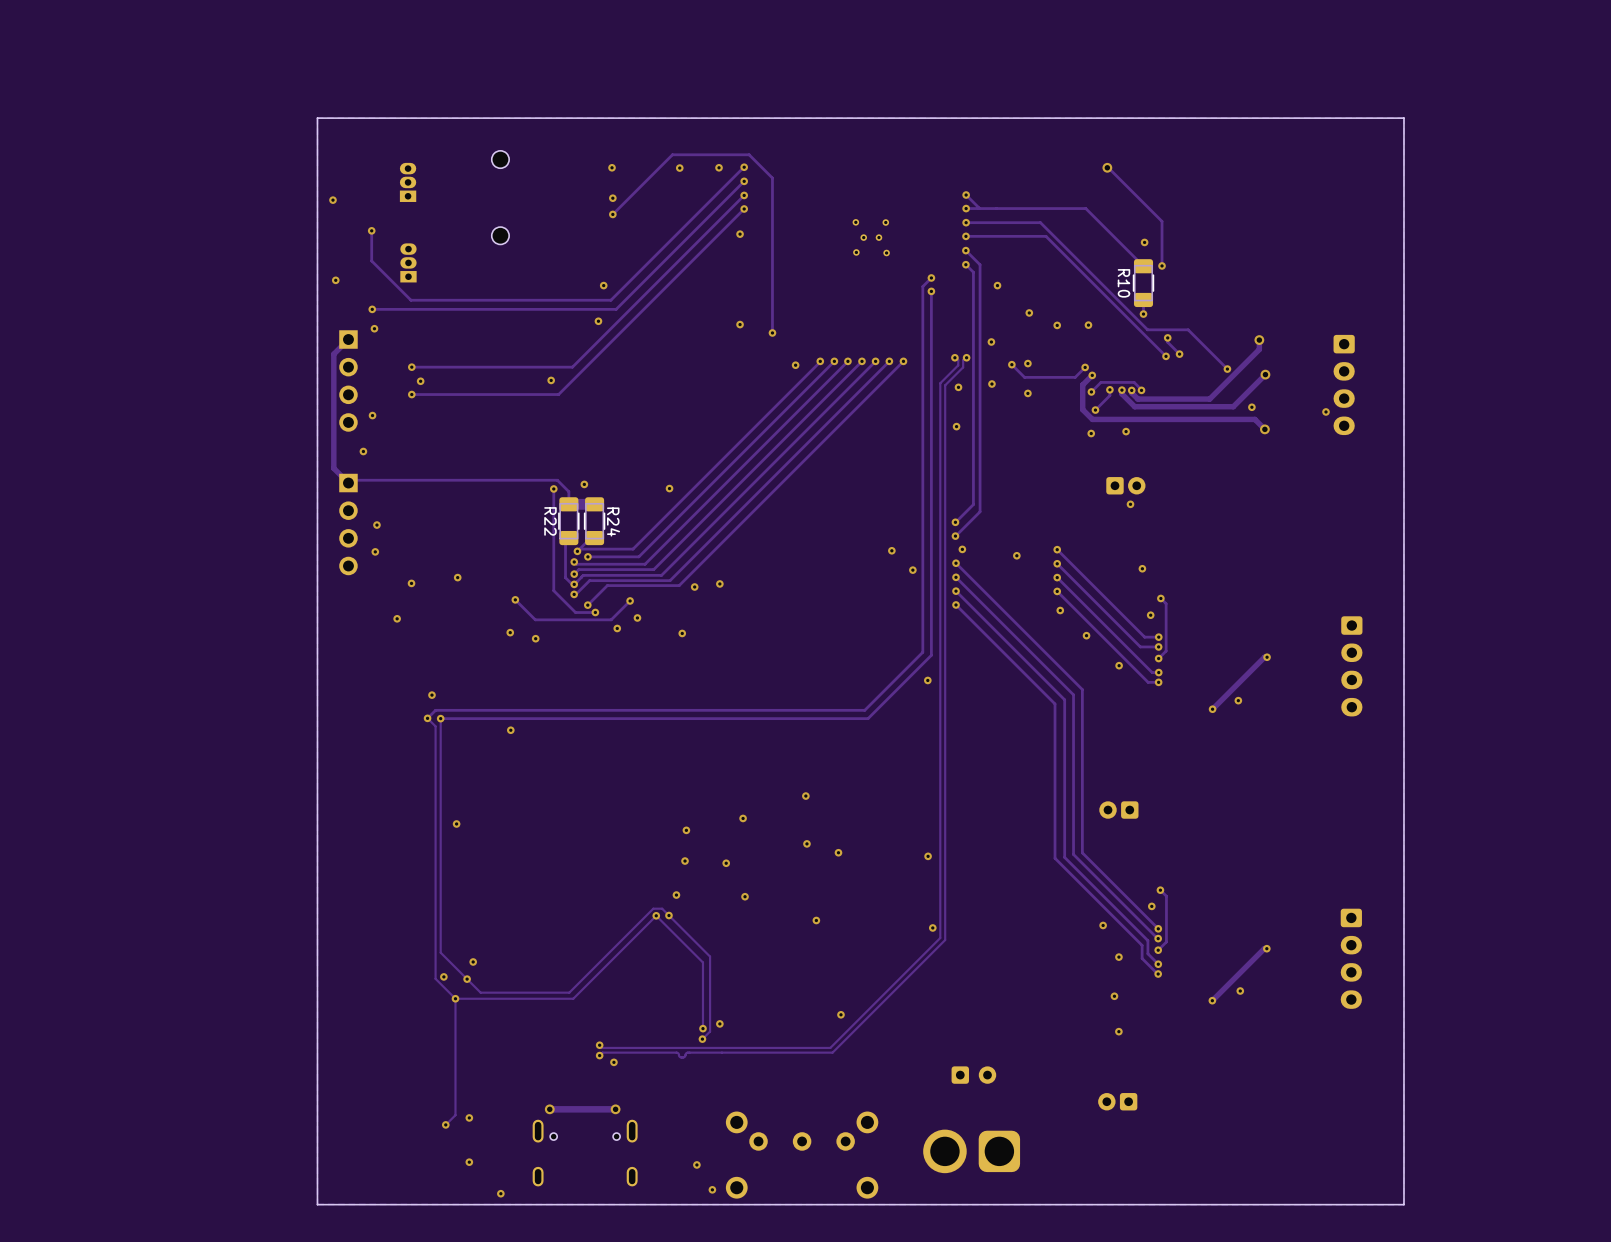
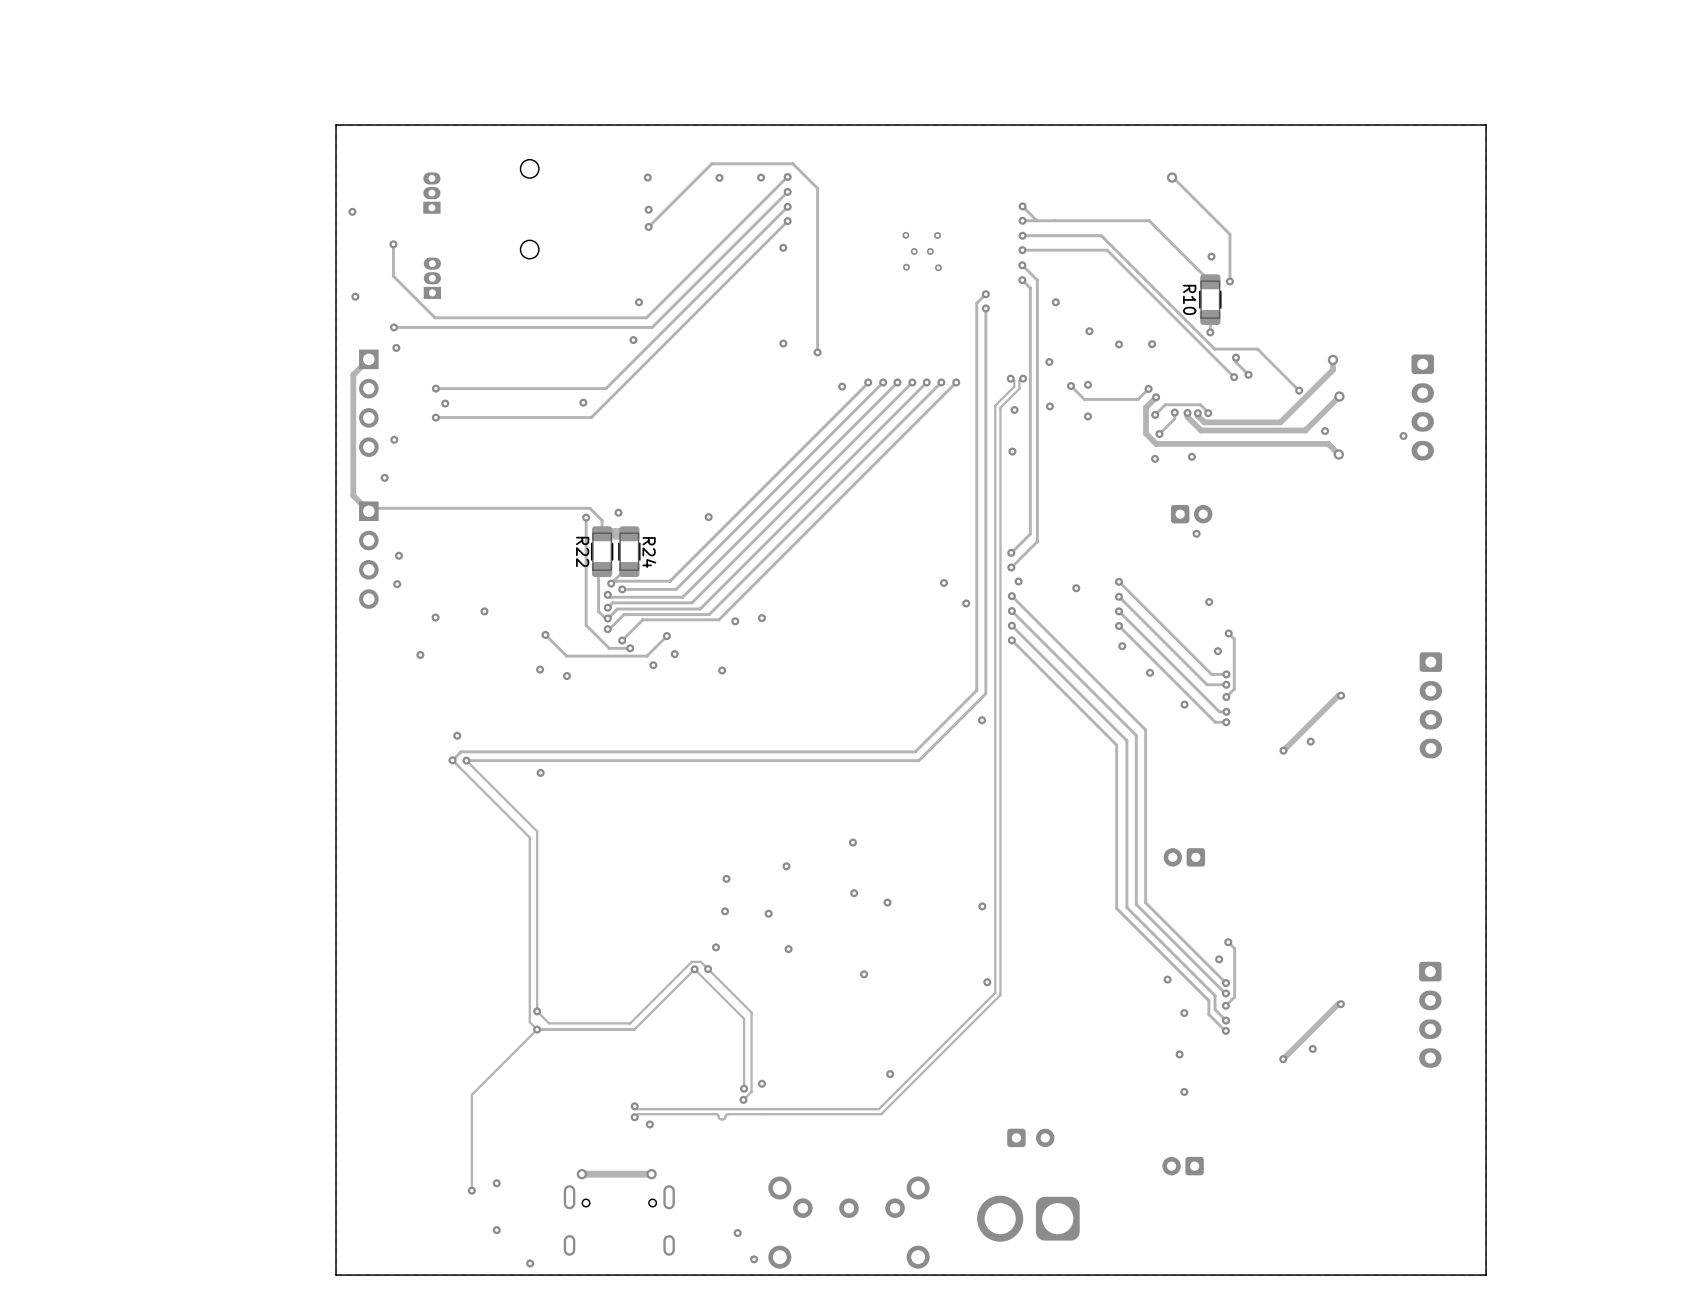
track: (440, 718) (440, 952) (480, 992) (569, 992) (653, 908) -> (466, 760) (537, 831) (537, 1011) (549, 1023) (630, 1023) (691, 961)
track: (435, 726) (435, 978) (455, 998) -> (461, 768) (529, 837) (529, 1022) (537, 1029)
via: (456, 823) -> none
via: none -> (537, 1011)
via: (473, 961) -> none
via: none -> (537, 1029)
track: (599, 972) (573, 998) (455, 998) -> (634, 1029) (537, 1029)
via: (443, 976) -> none
via: (467, 979) -> none
track: (455, 998) (455, 1115) (445, 1124) -> (537, 1029) (471, 1094) (471, 1190)
via: (455, 998) -> none

